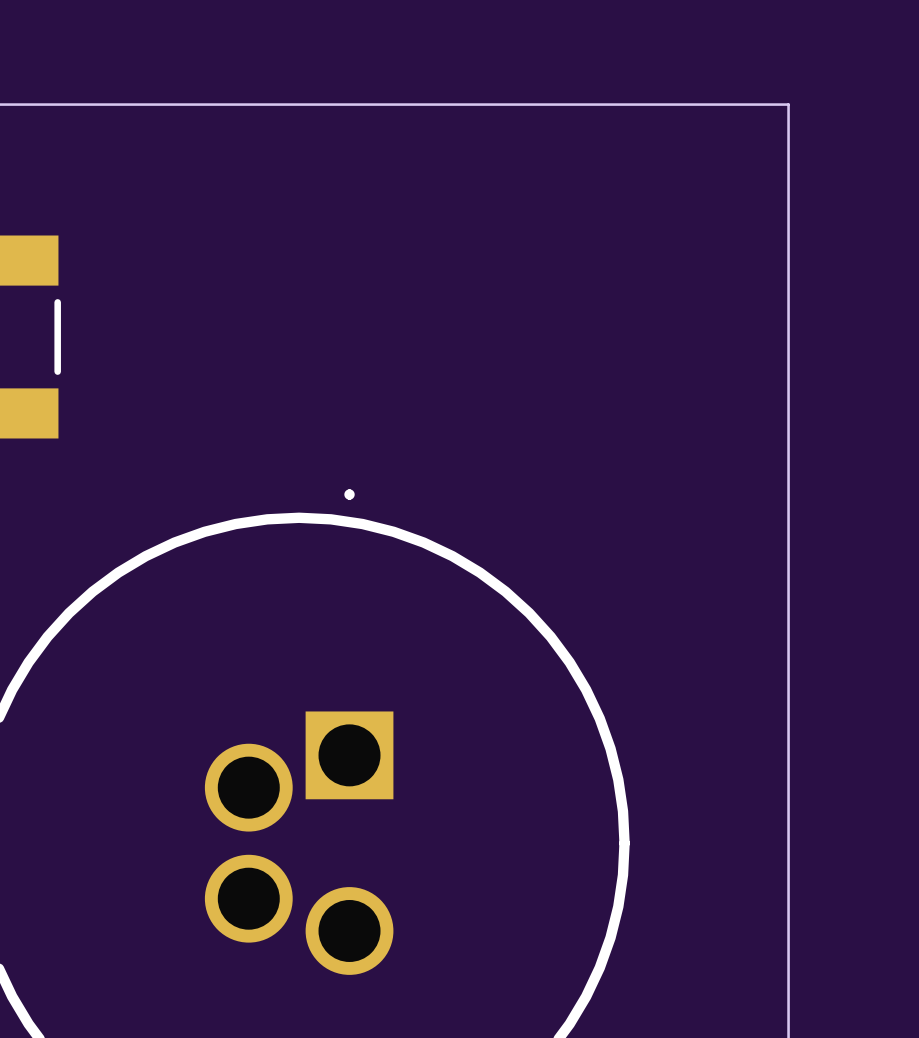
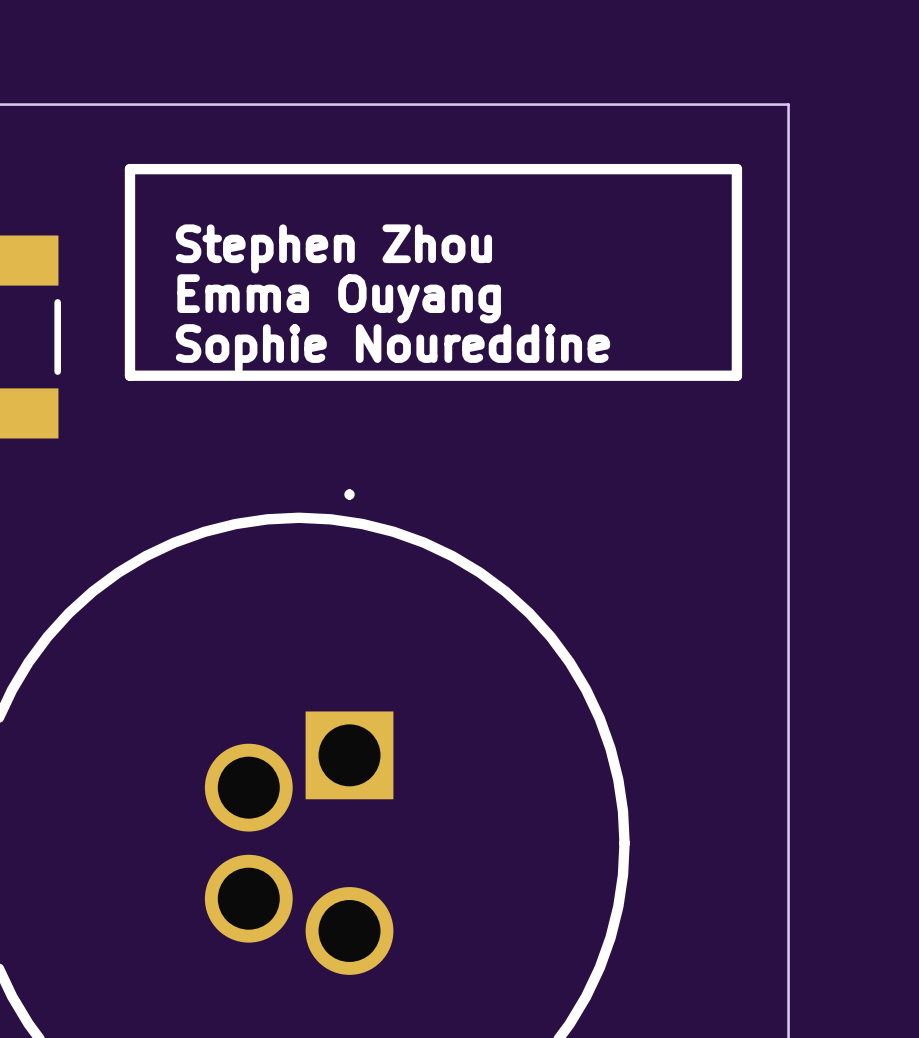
line: none -> (129, 169) (736, 169) (736, 375) (129, 375) (129, 169)
text: none -> Stephen Zhou (333, 248)
text: none -> Emma Ouyang (339, 298)
text: none -> Sophie Noureddine (392, 348)

